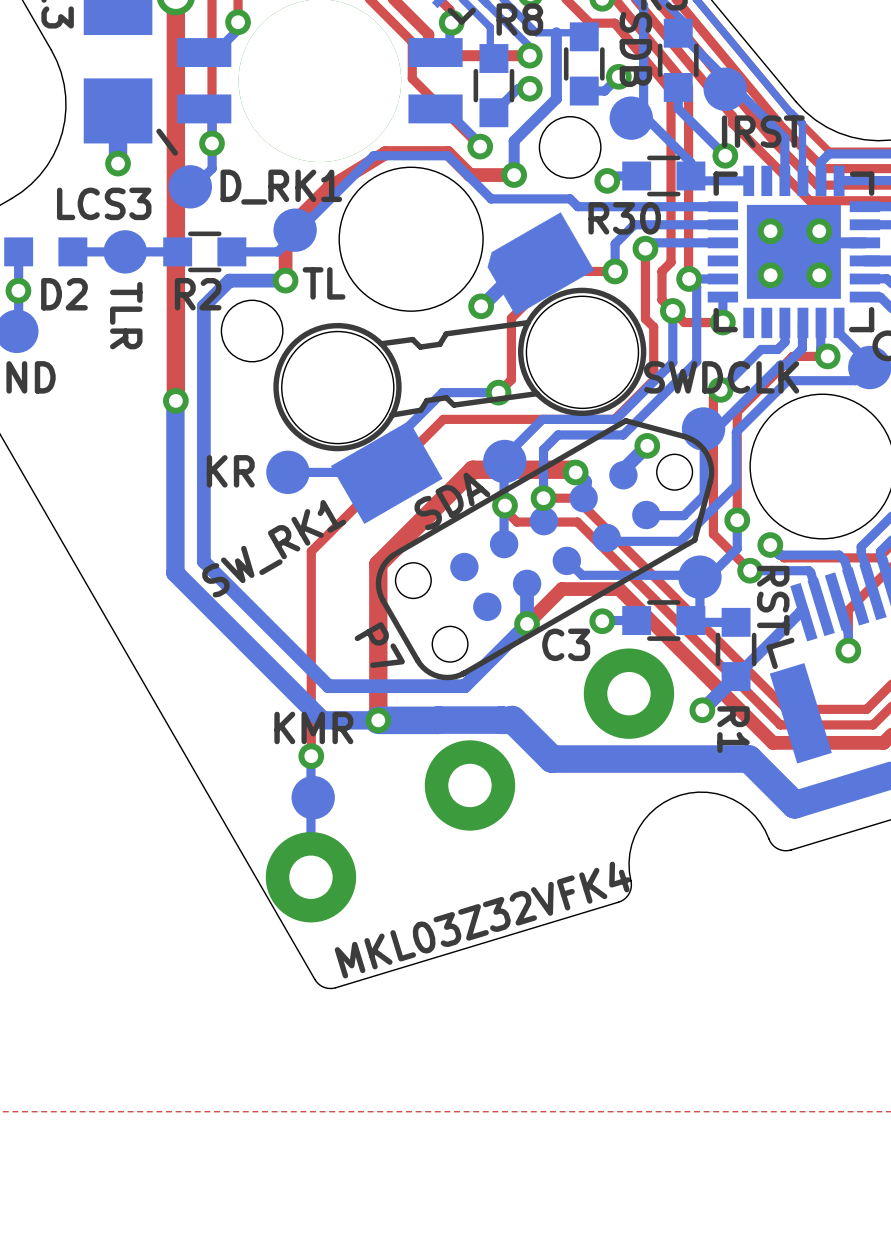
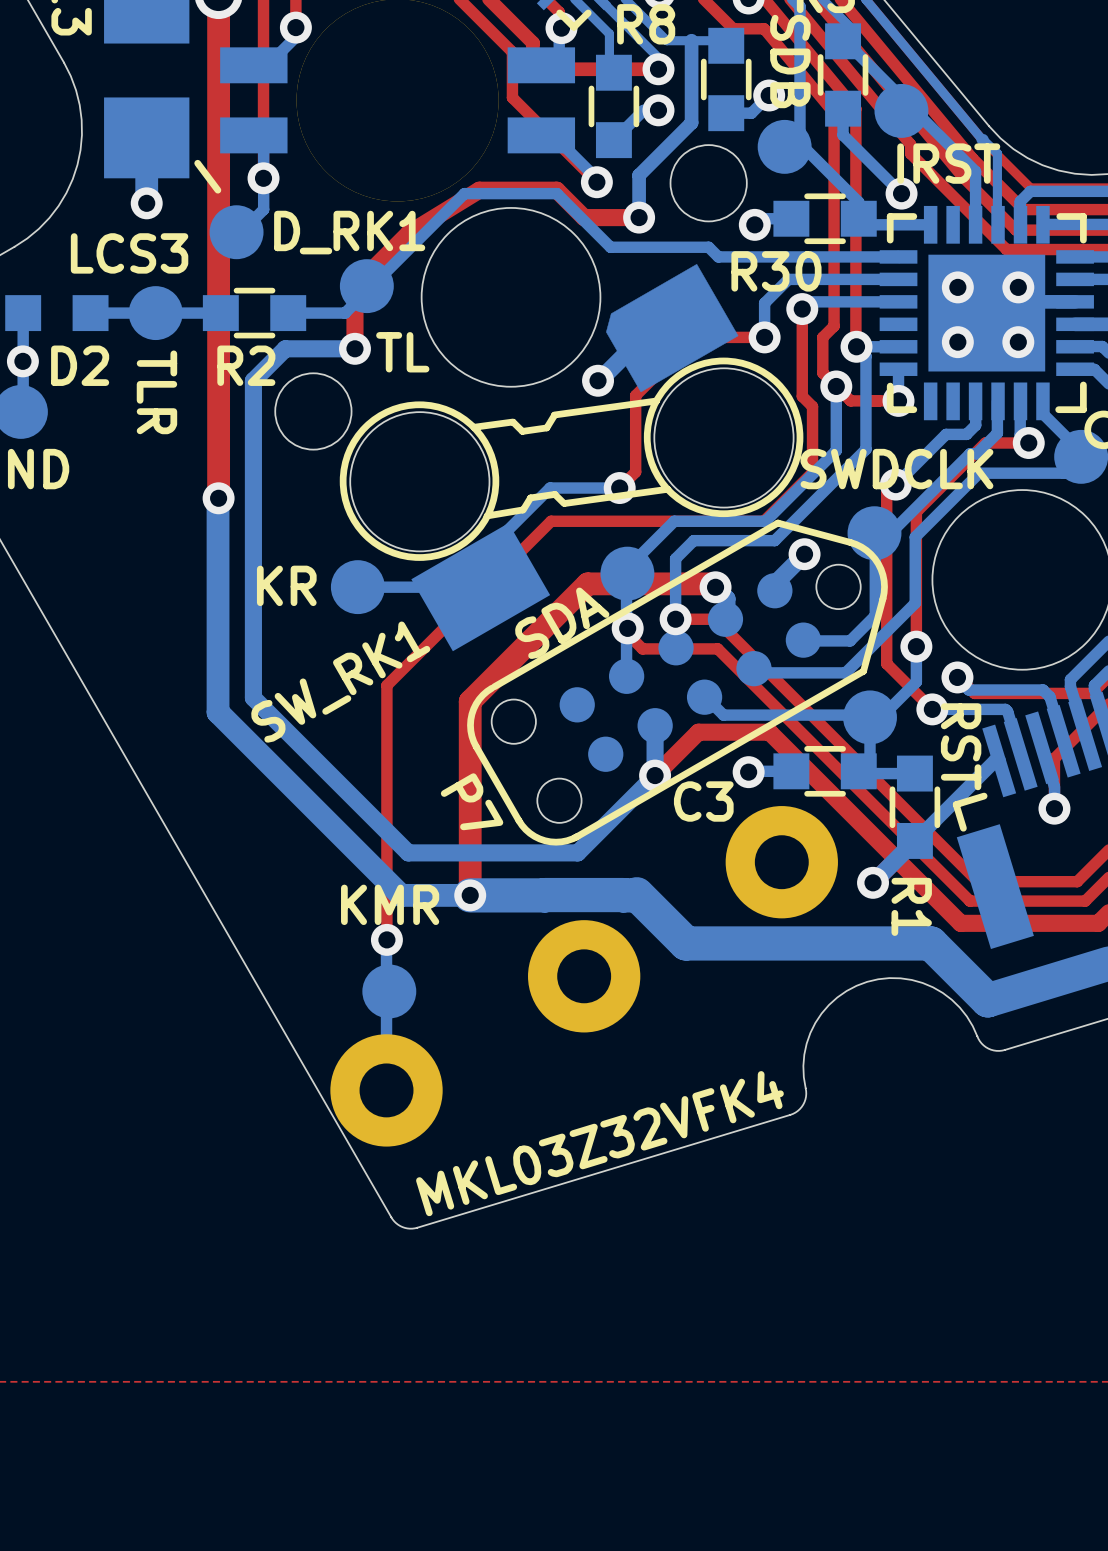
board edge: (768, 839) (754, 815) (741, 804) (724, 796) (698, 792) (671, 798) (656, 807) (638, 828) (629, 853) (630, 889) (626, 897) (618, 902) -> (1004, 1049) (993, 1050) (983, 1045) (959, 1007) (933, 987) (900, 978) (867, 981) (837, 997) (821, 1013) (810, 1033) (804, 1054) (803, 1077) (806, 1093) (804, 1102) (795, 1112) (768, 1121)
board edge: (768, 839) (774, 846) (784, 850) (808, 844) -> none

